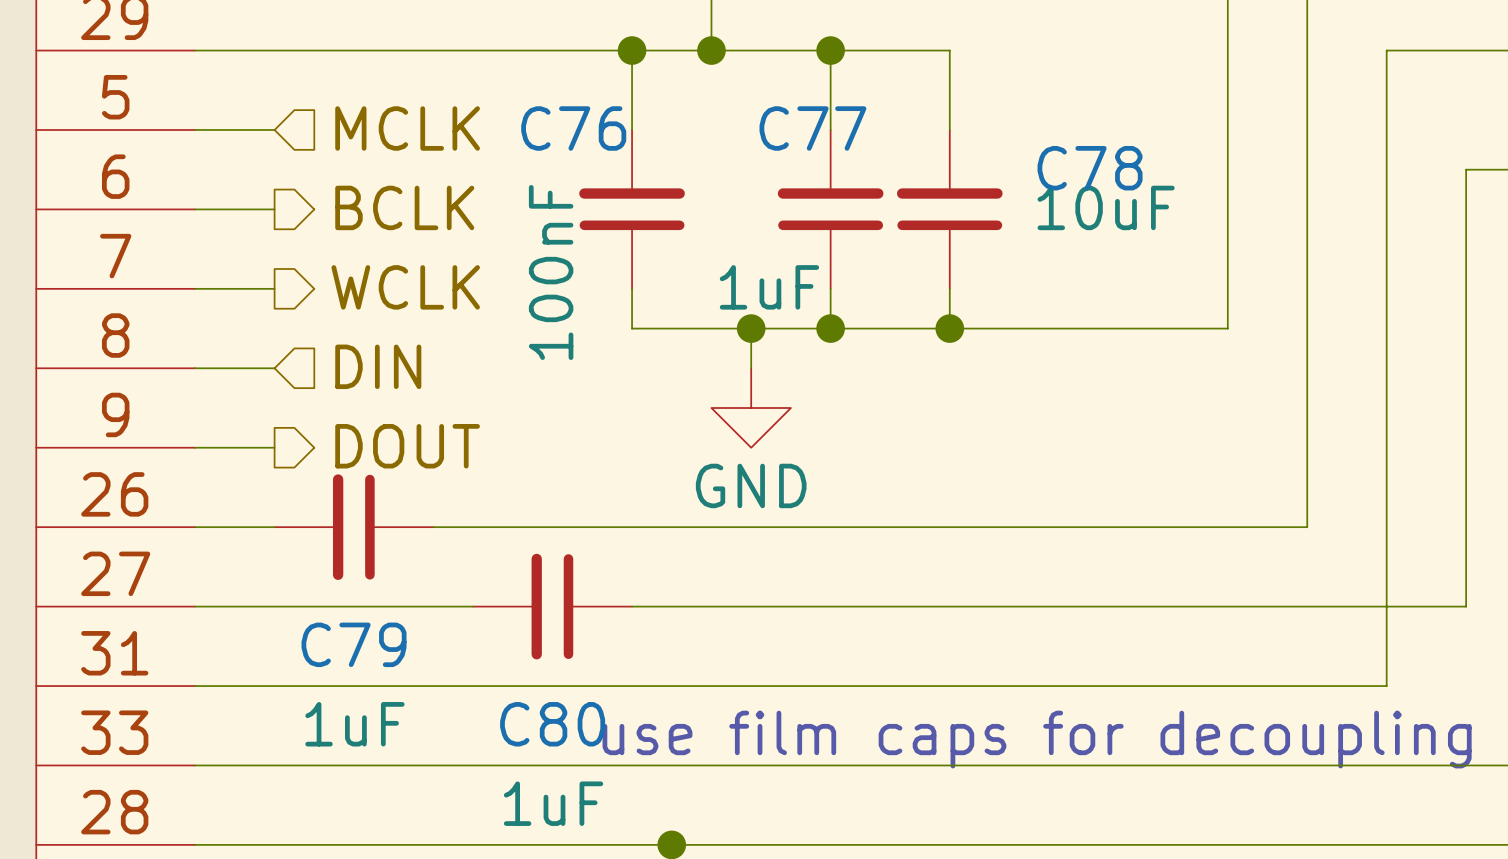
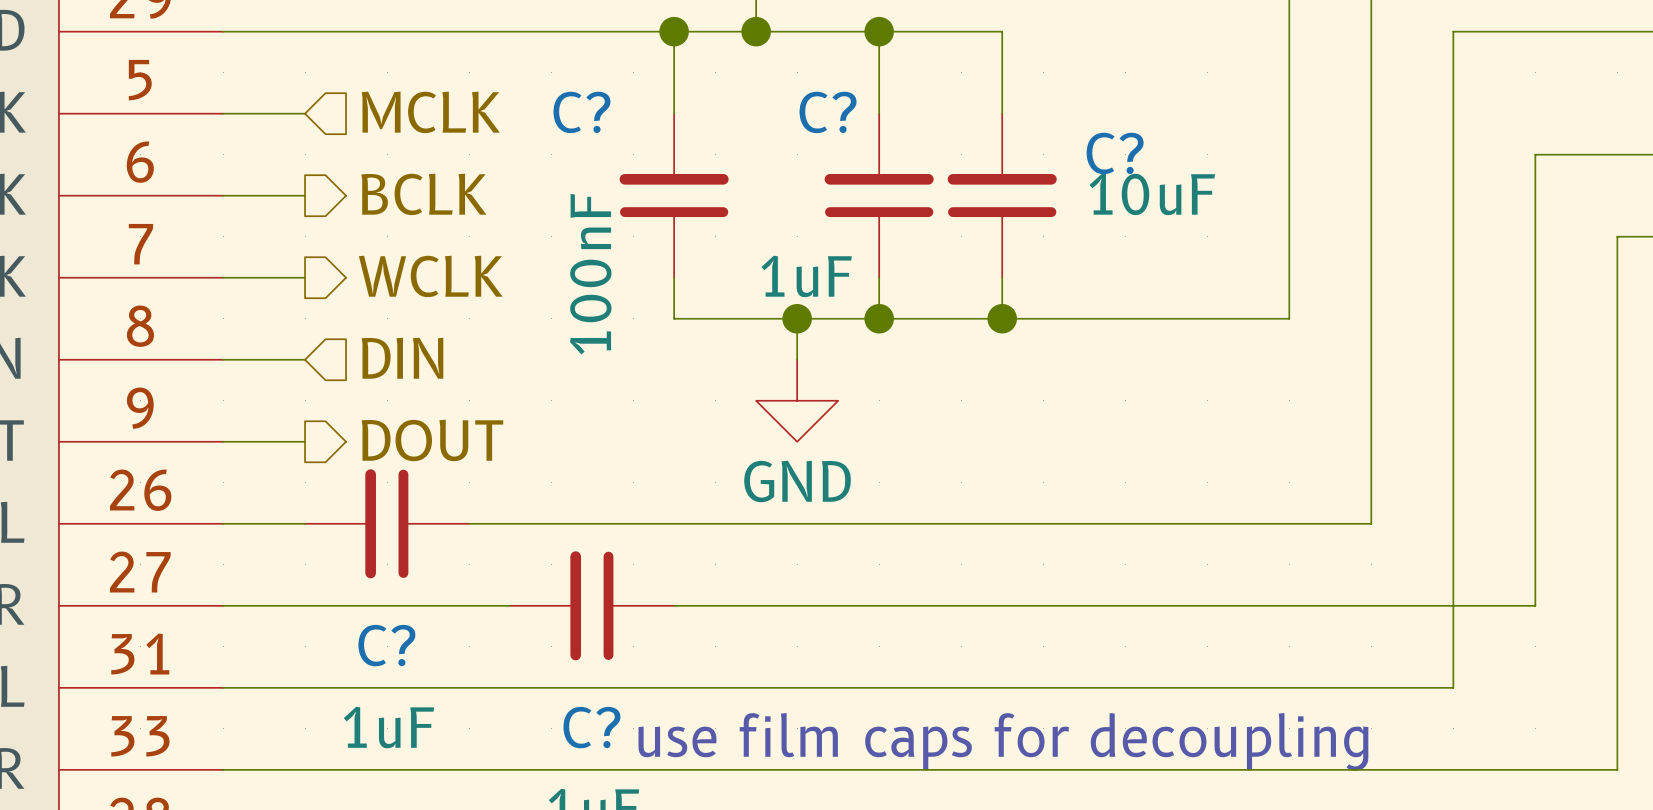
C76 name: C76 (573, 128) -> C? (581, 112)
C77 name: C77 (812, 128) -> C? (828, 112)
C78 name: C78 (1090, 168) -> C? (1115, 153)
C79 name: C79 (354, 644) -> C? (386, 645)
C80 name: C80 (552, 724) -> C? (591, 727)

